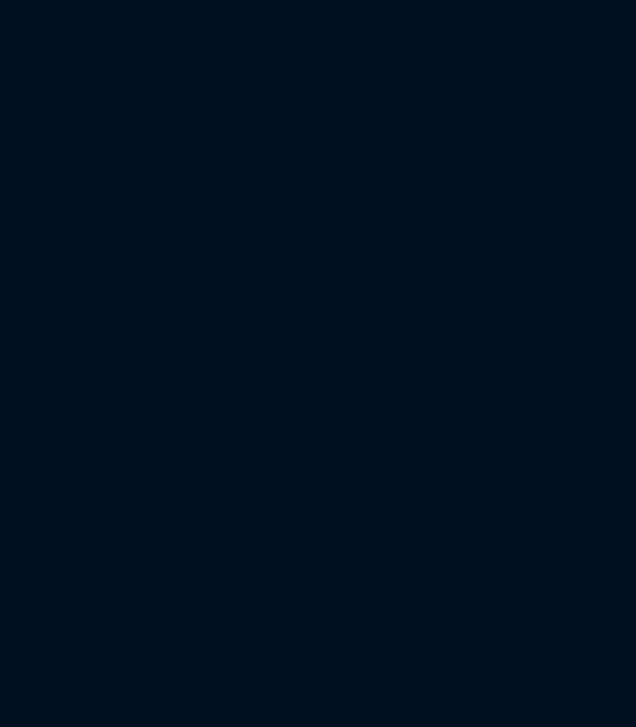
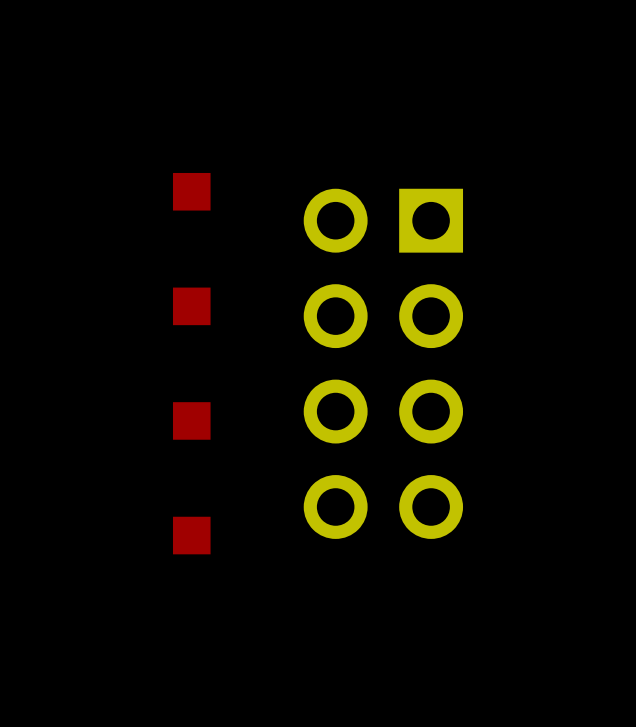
part: none -> (191, 191)
part: none -> (191, 306)
part: none -> (383, 363)
part: none -> (191, 420)
part: none -> (191, 535)

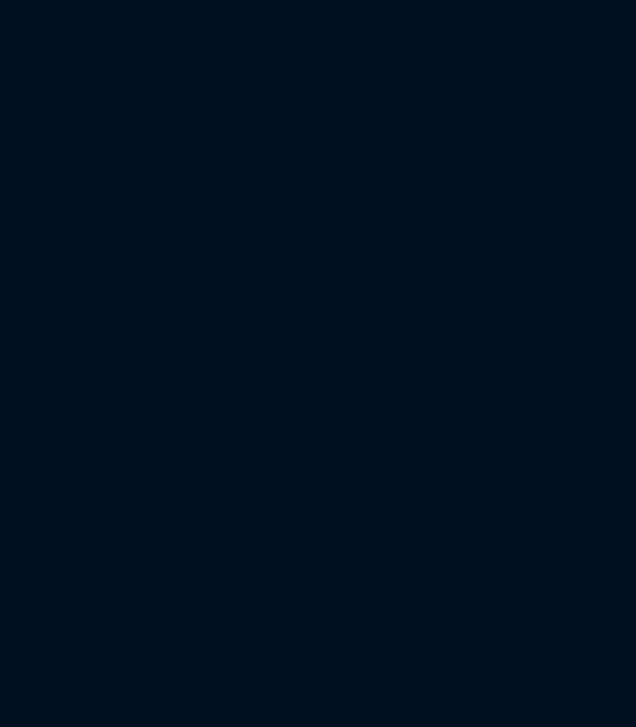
part: (191, 191) -> none
part: (191, 306) -> none
part: (383, 363) -> none
part: (191, 420) -> none
part: (191, 535) -> none

